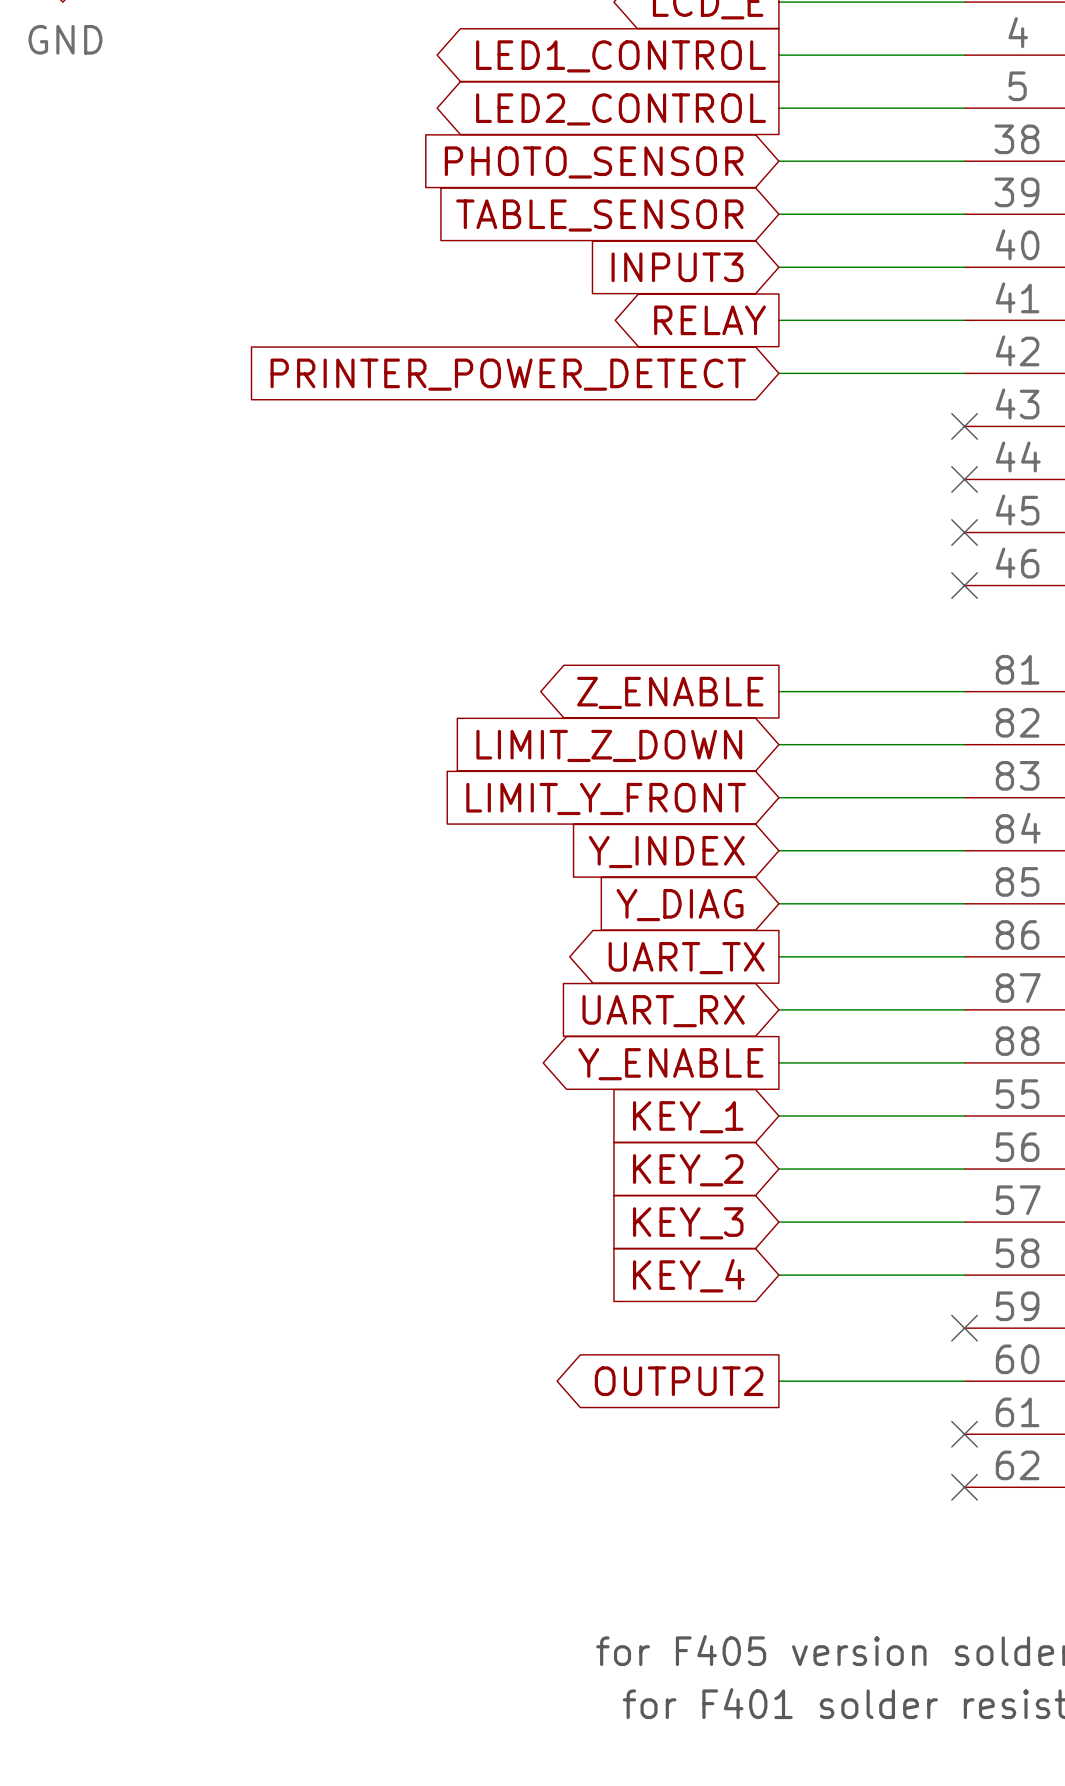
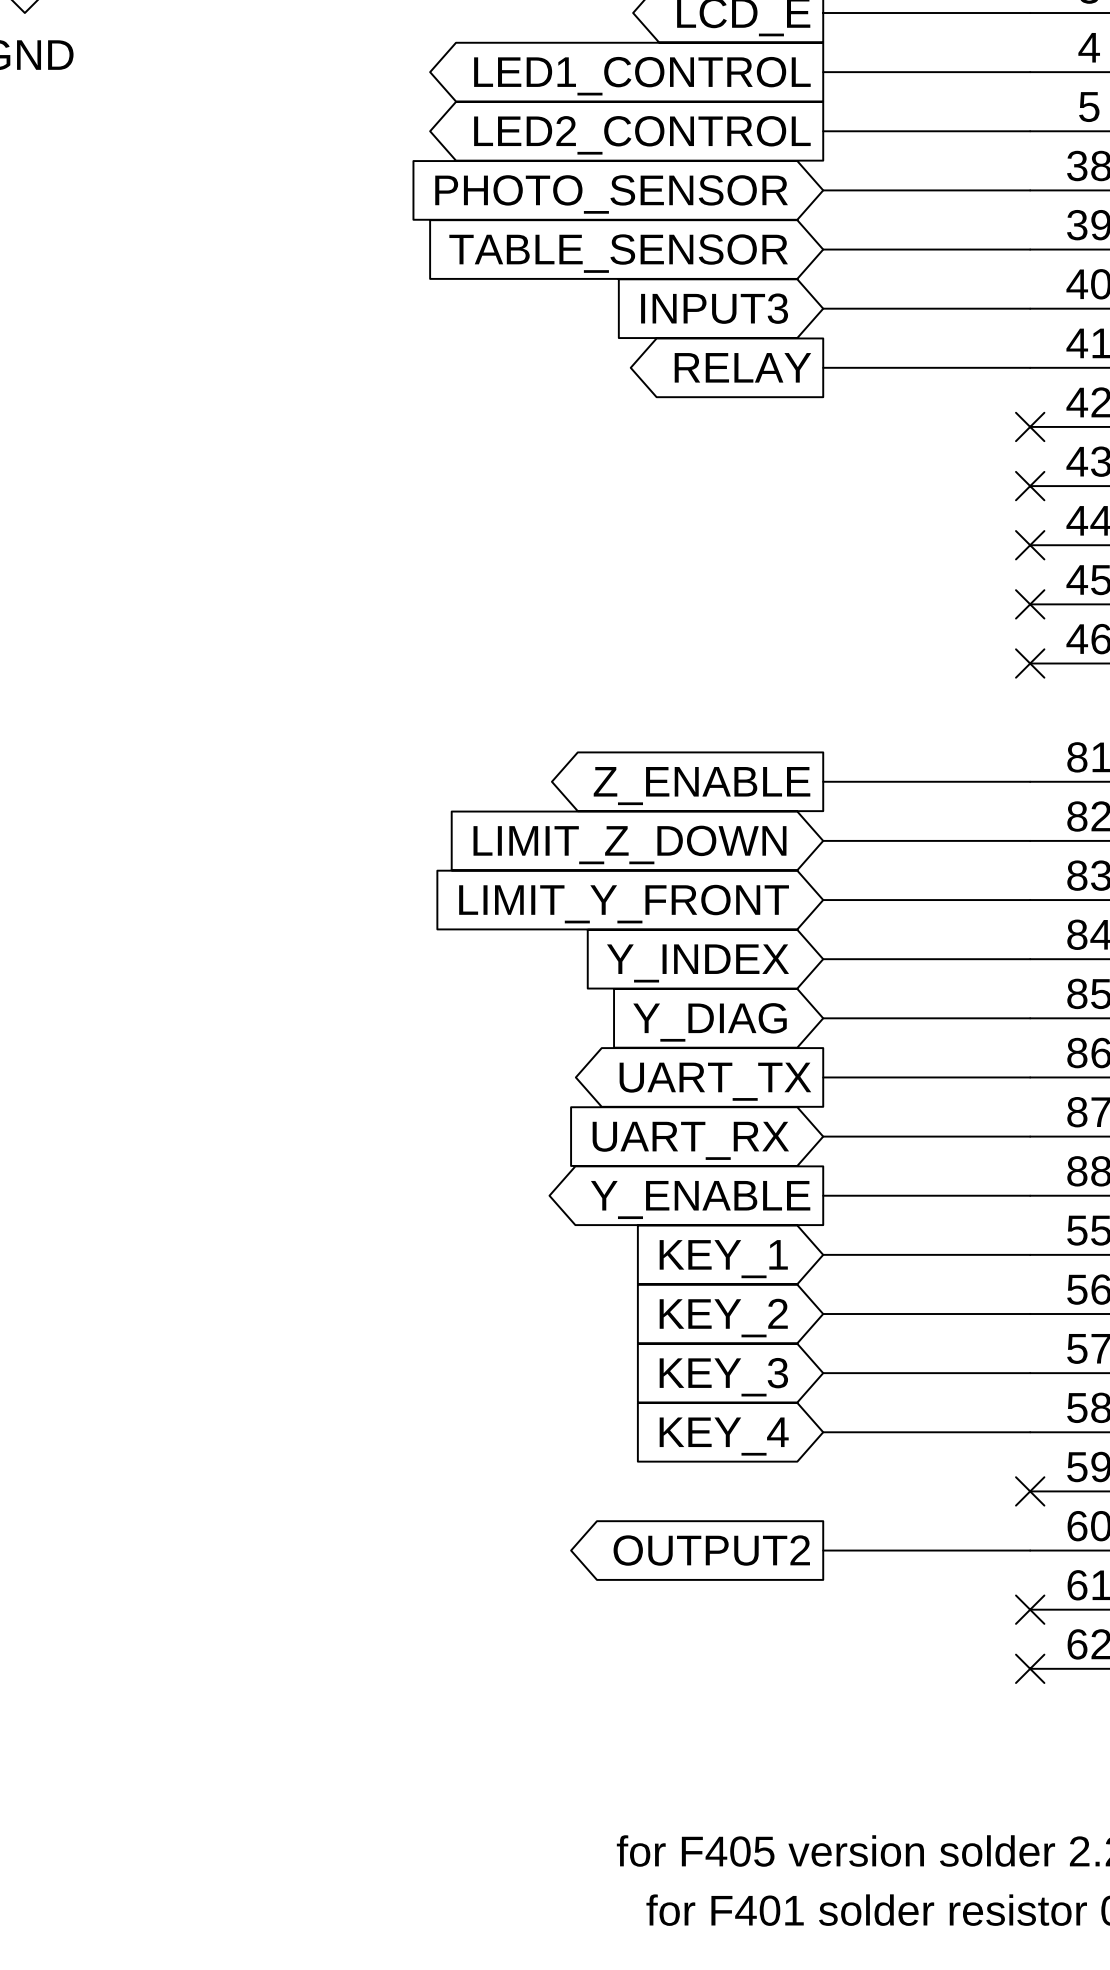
wire: (778, 373) (964, 373) -> none
no-connect mark: none -> (1030, 426)
global label: PRINTER_POWER_DETECT (508, 374) -> none

